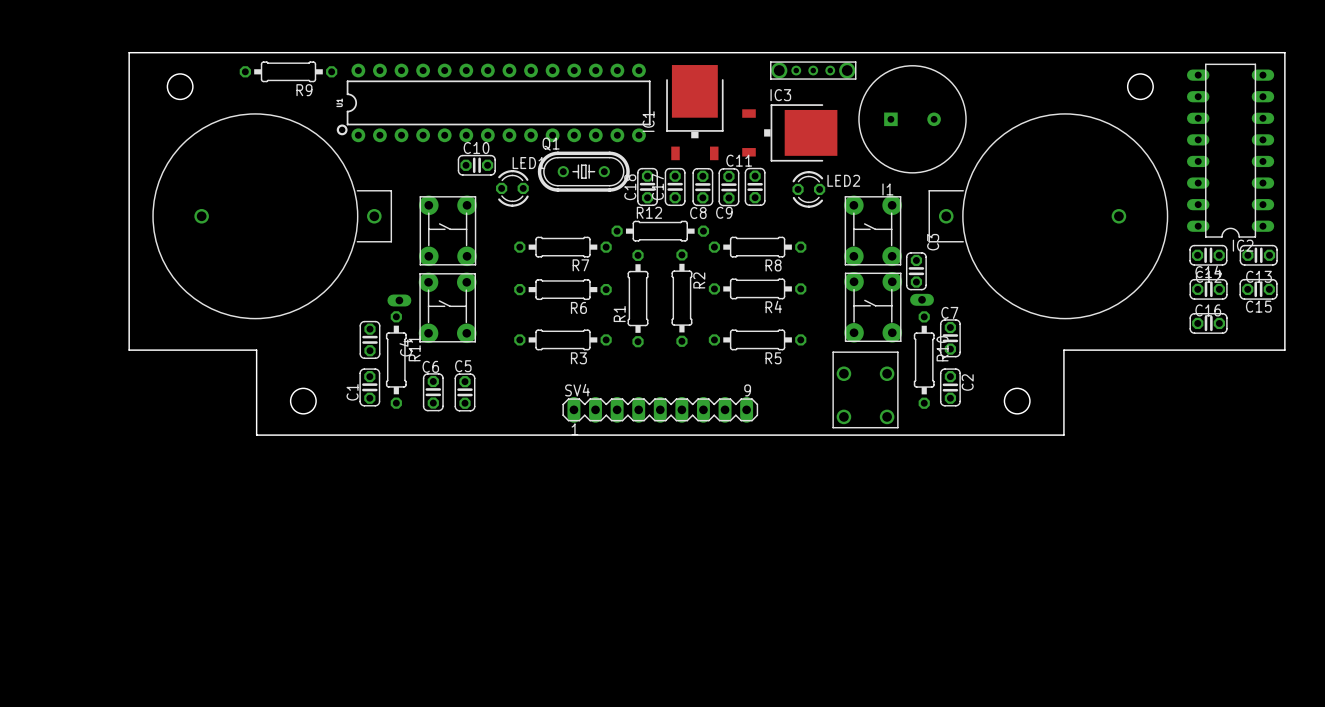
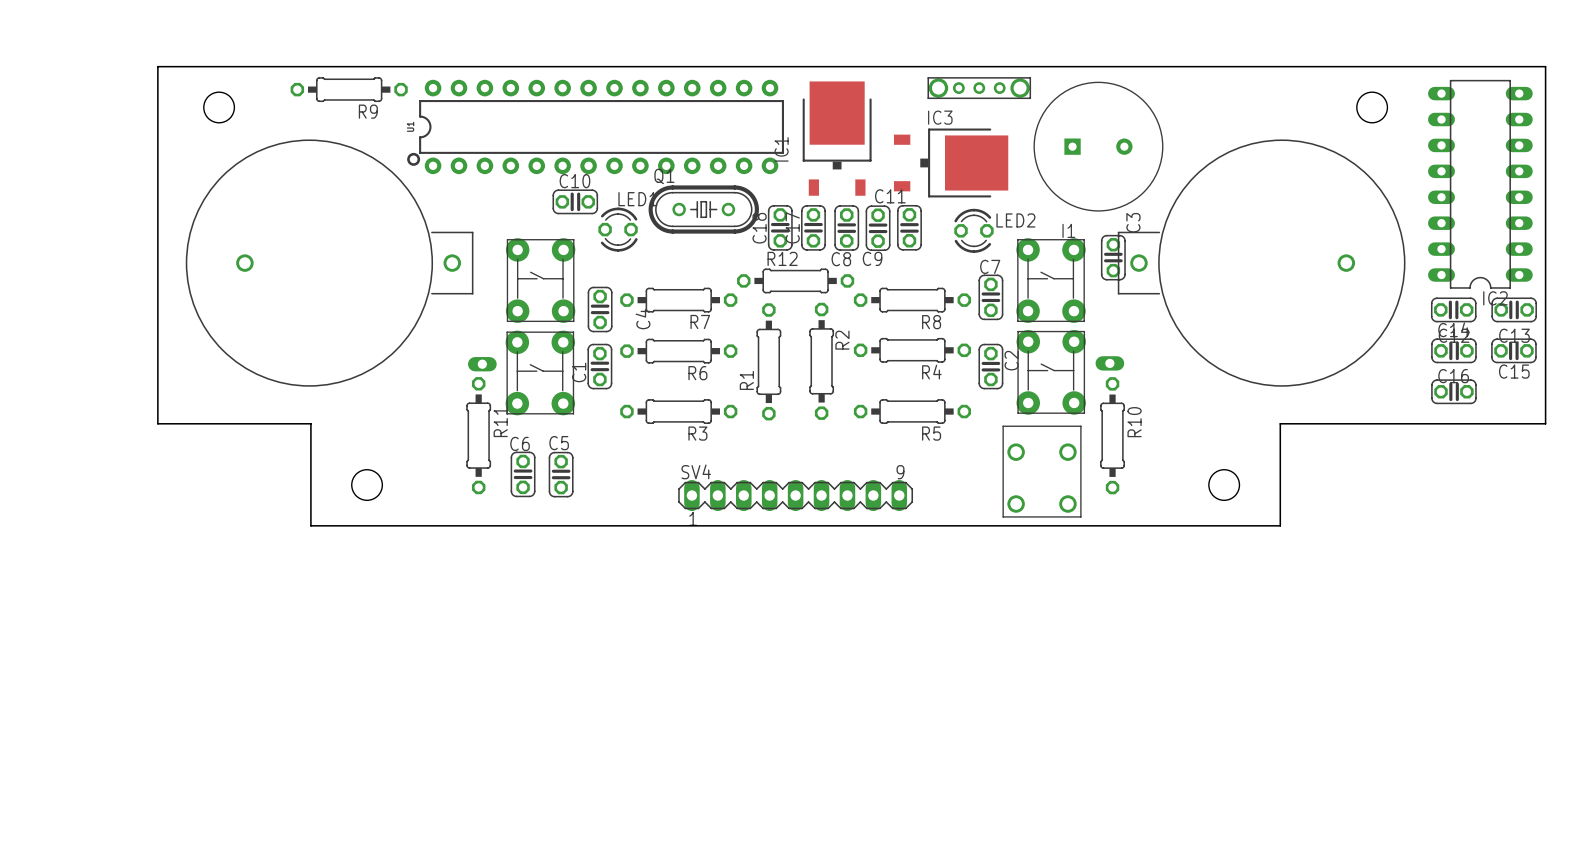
C3 position: (916, 271) -> (1113, 257)
C7 position: (950, 338) -> (990, 297)
C4 position: (369, 339) -> (600, 309)
C1 position: (369, 387) -> (599, 366)
C2 position: (950, 387) -> (990, 366)

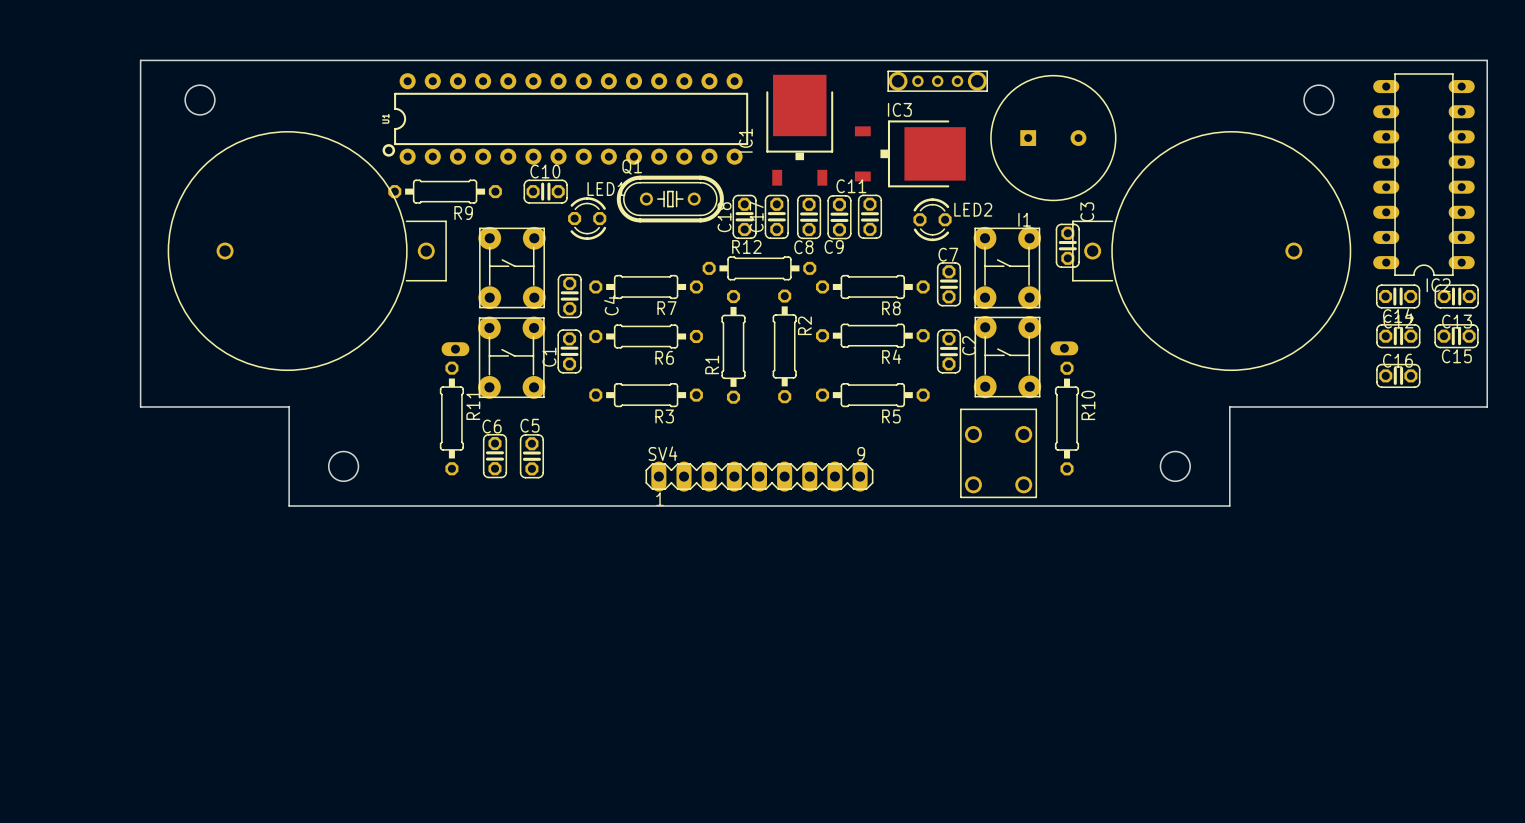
R9 position: (349, 89) -> (445, 191)

